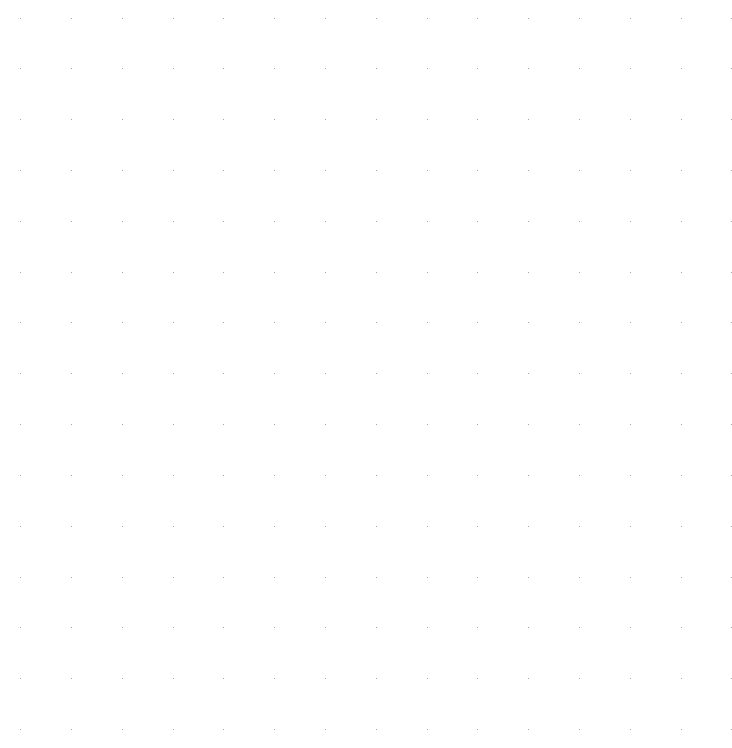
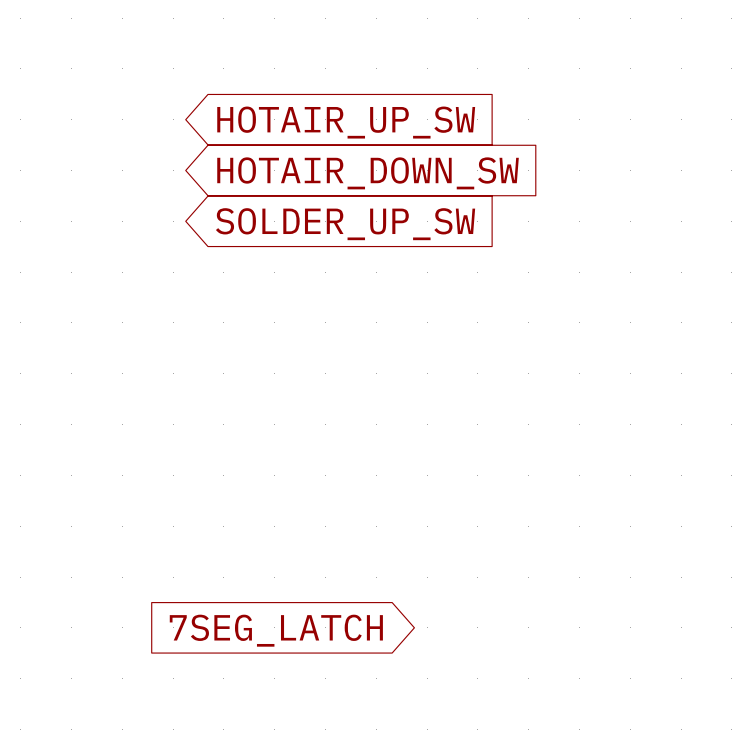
global label: none -> HOTAIR_UP_SW (346, 122)
global label: none -> HOTAIR_DOWN_SW (368, 173)
global label: none -> SOLDER_UP_SW (345, 224)
global label: none -> 7SEG_LATCH (276, 630)

